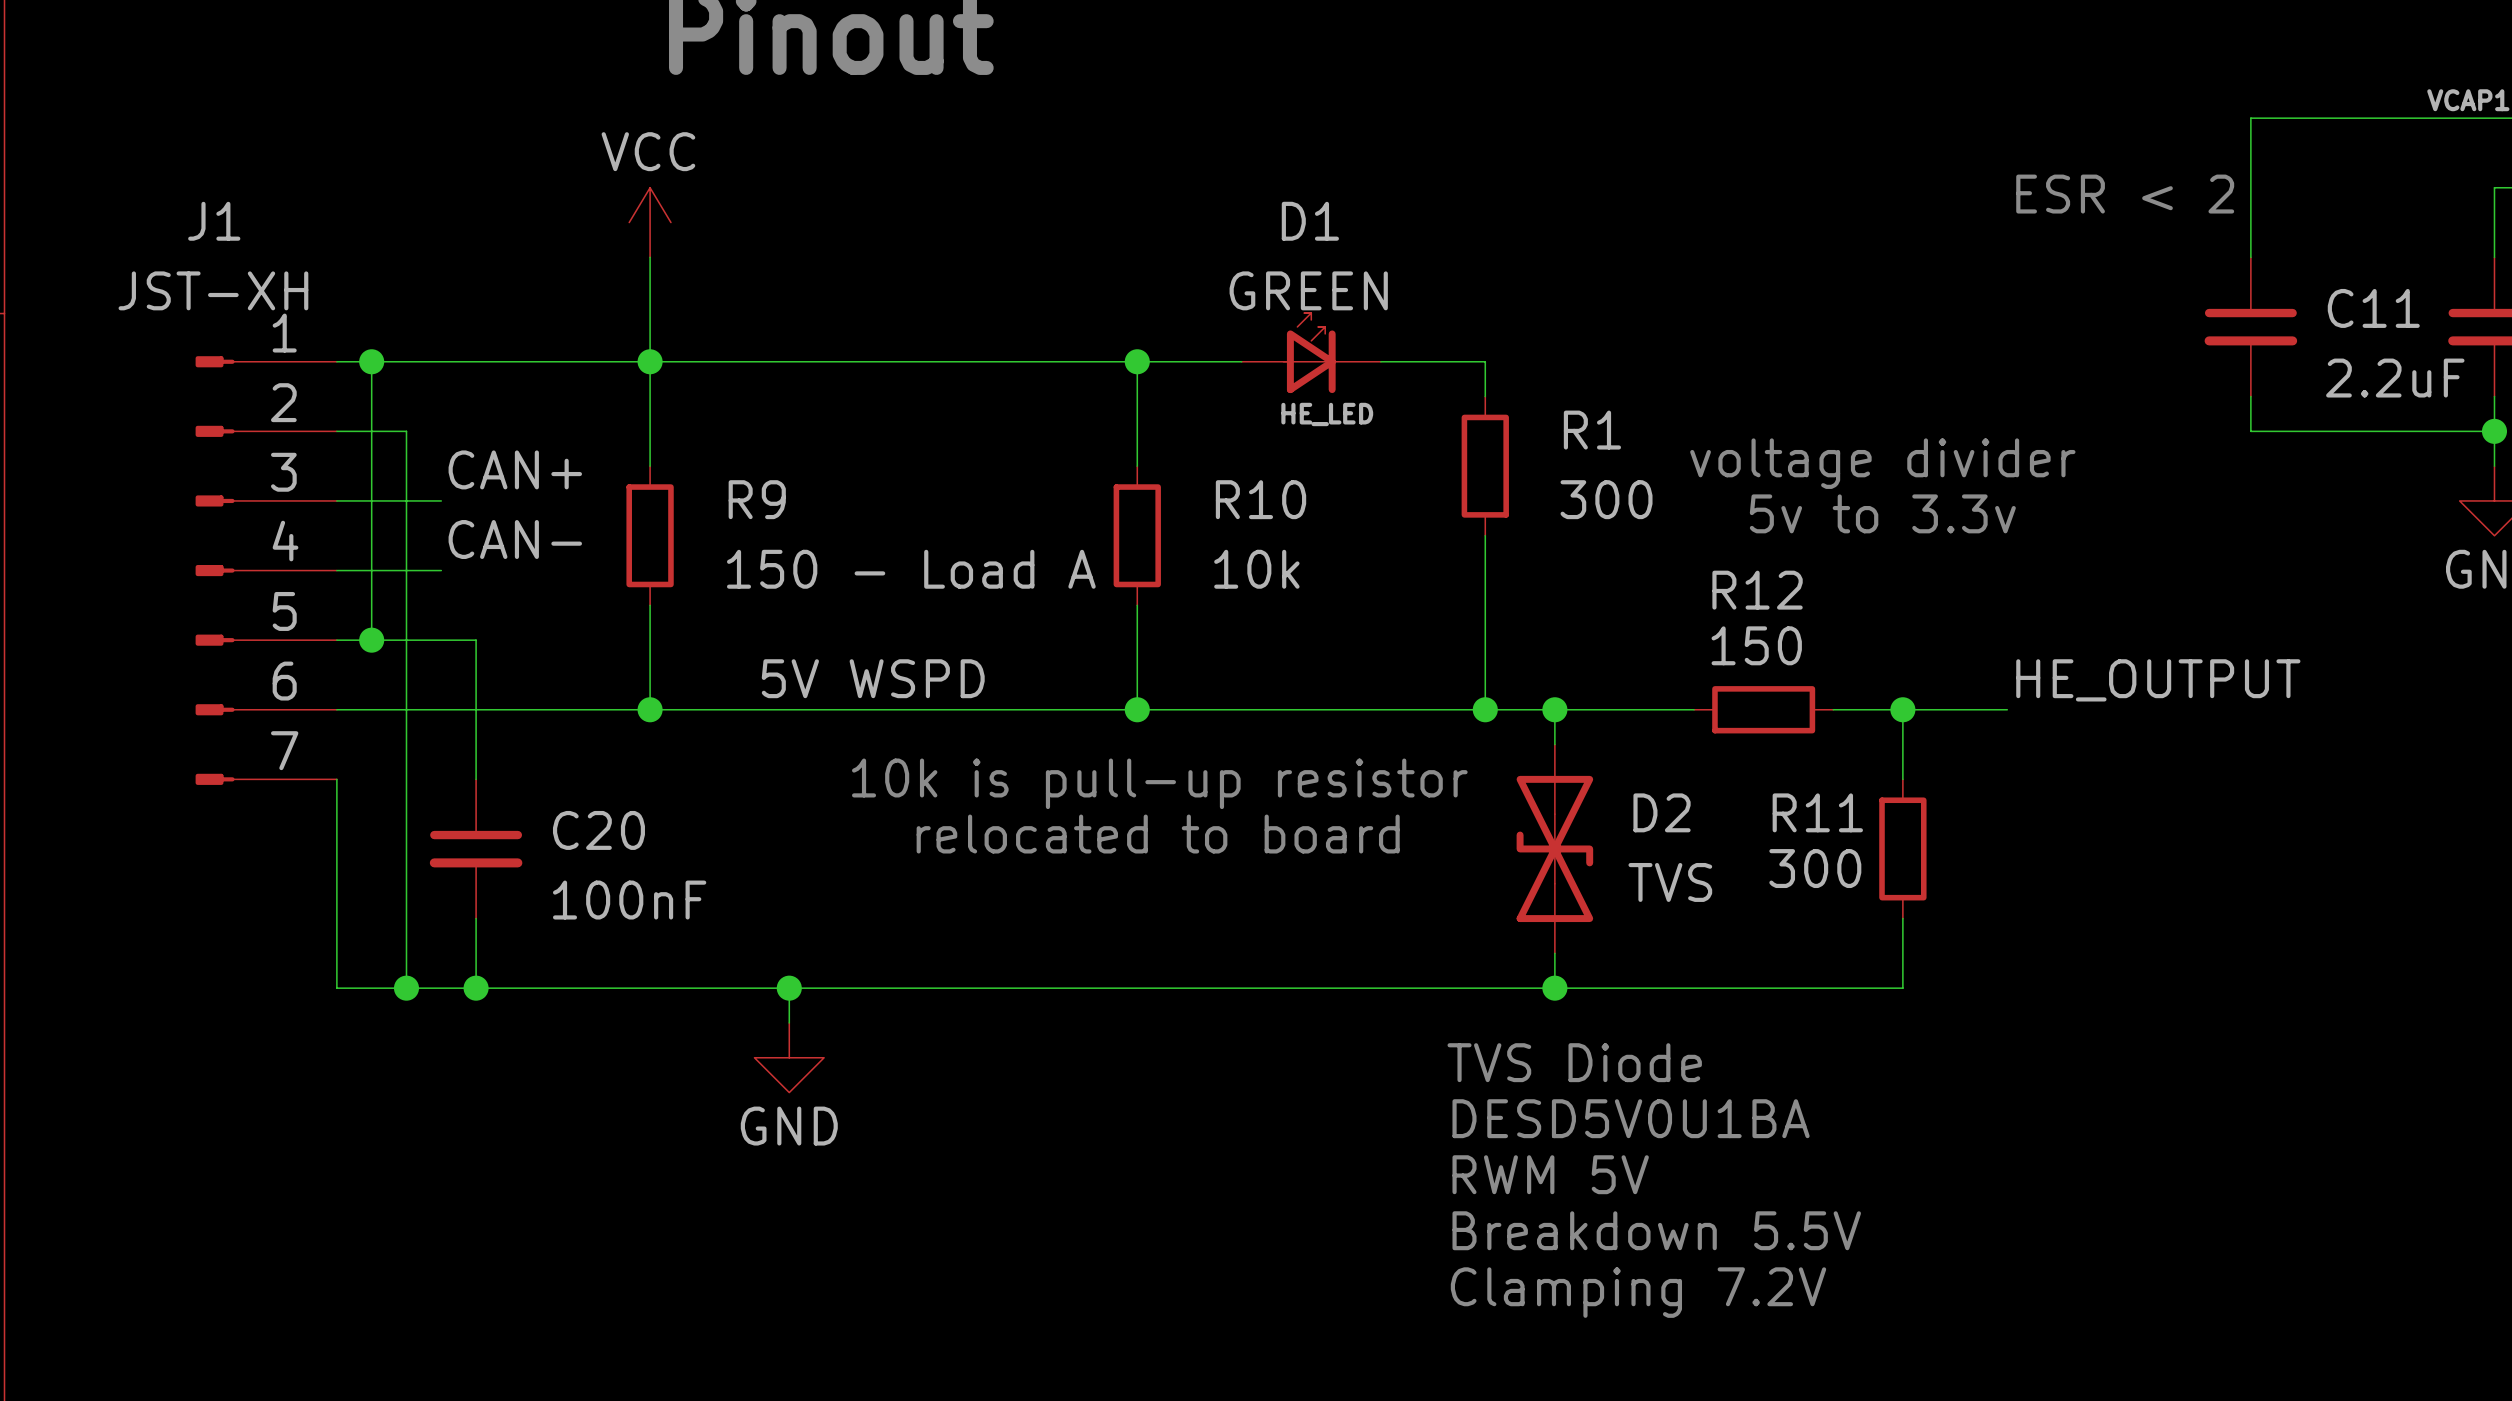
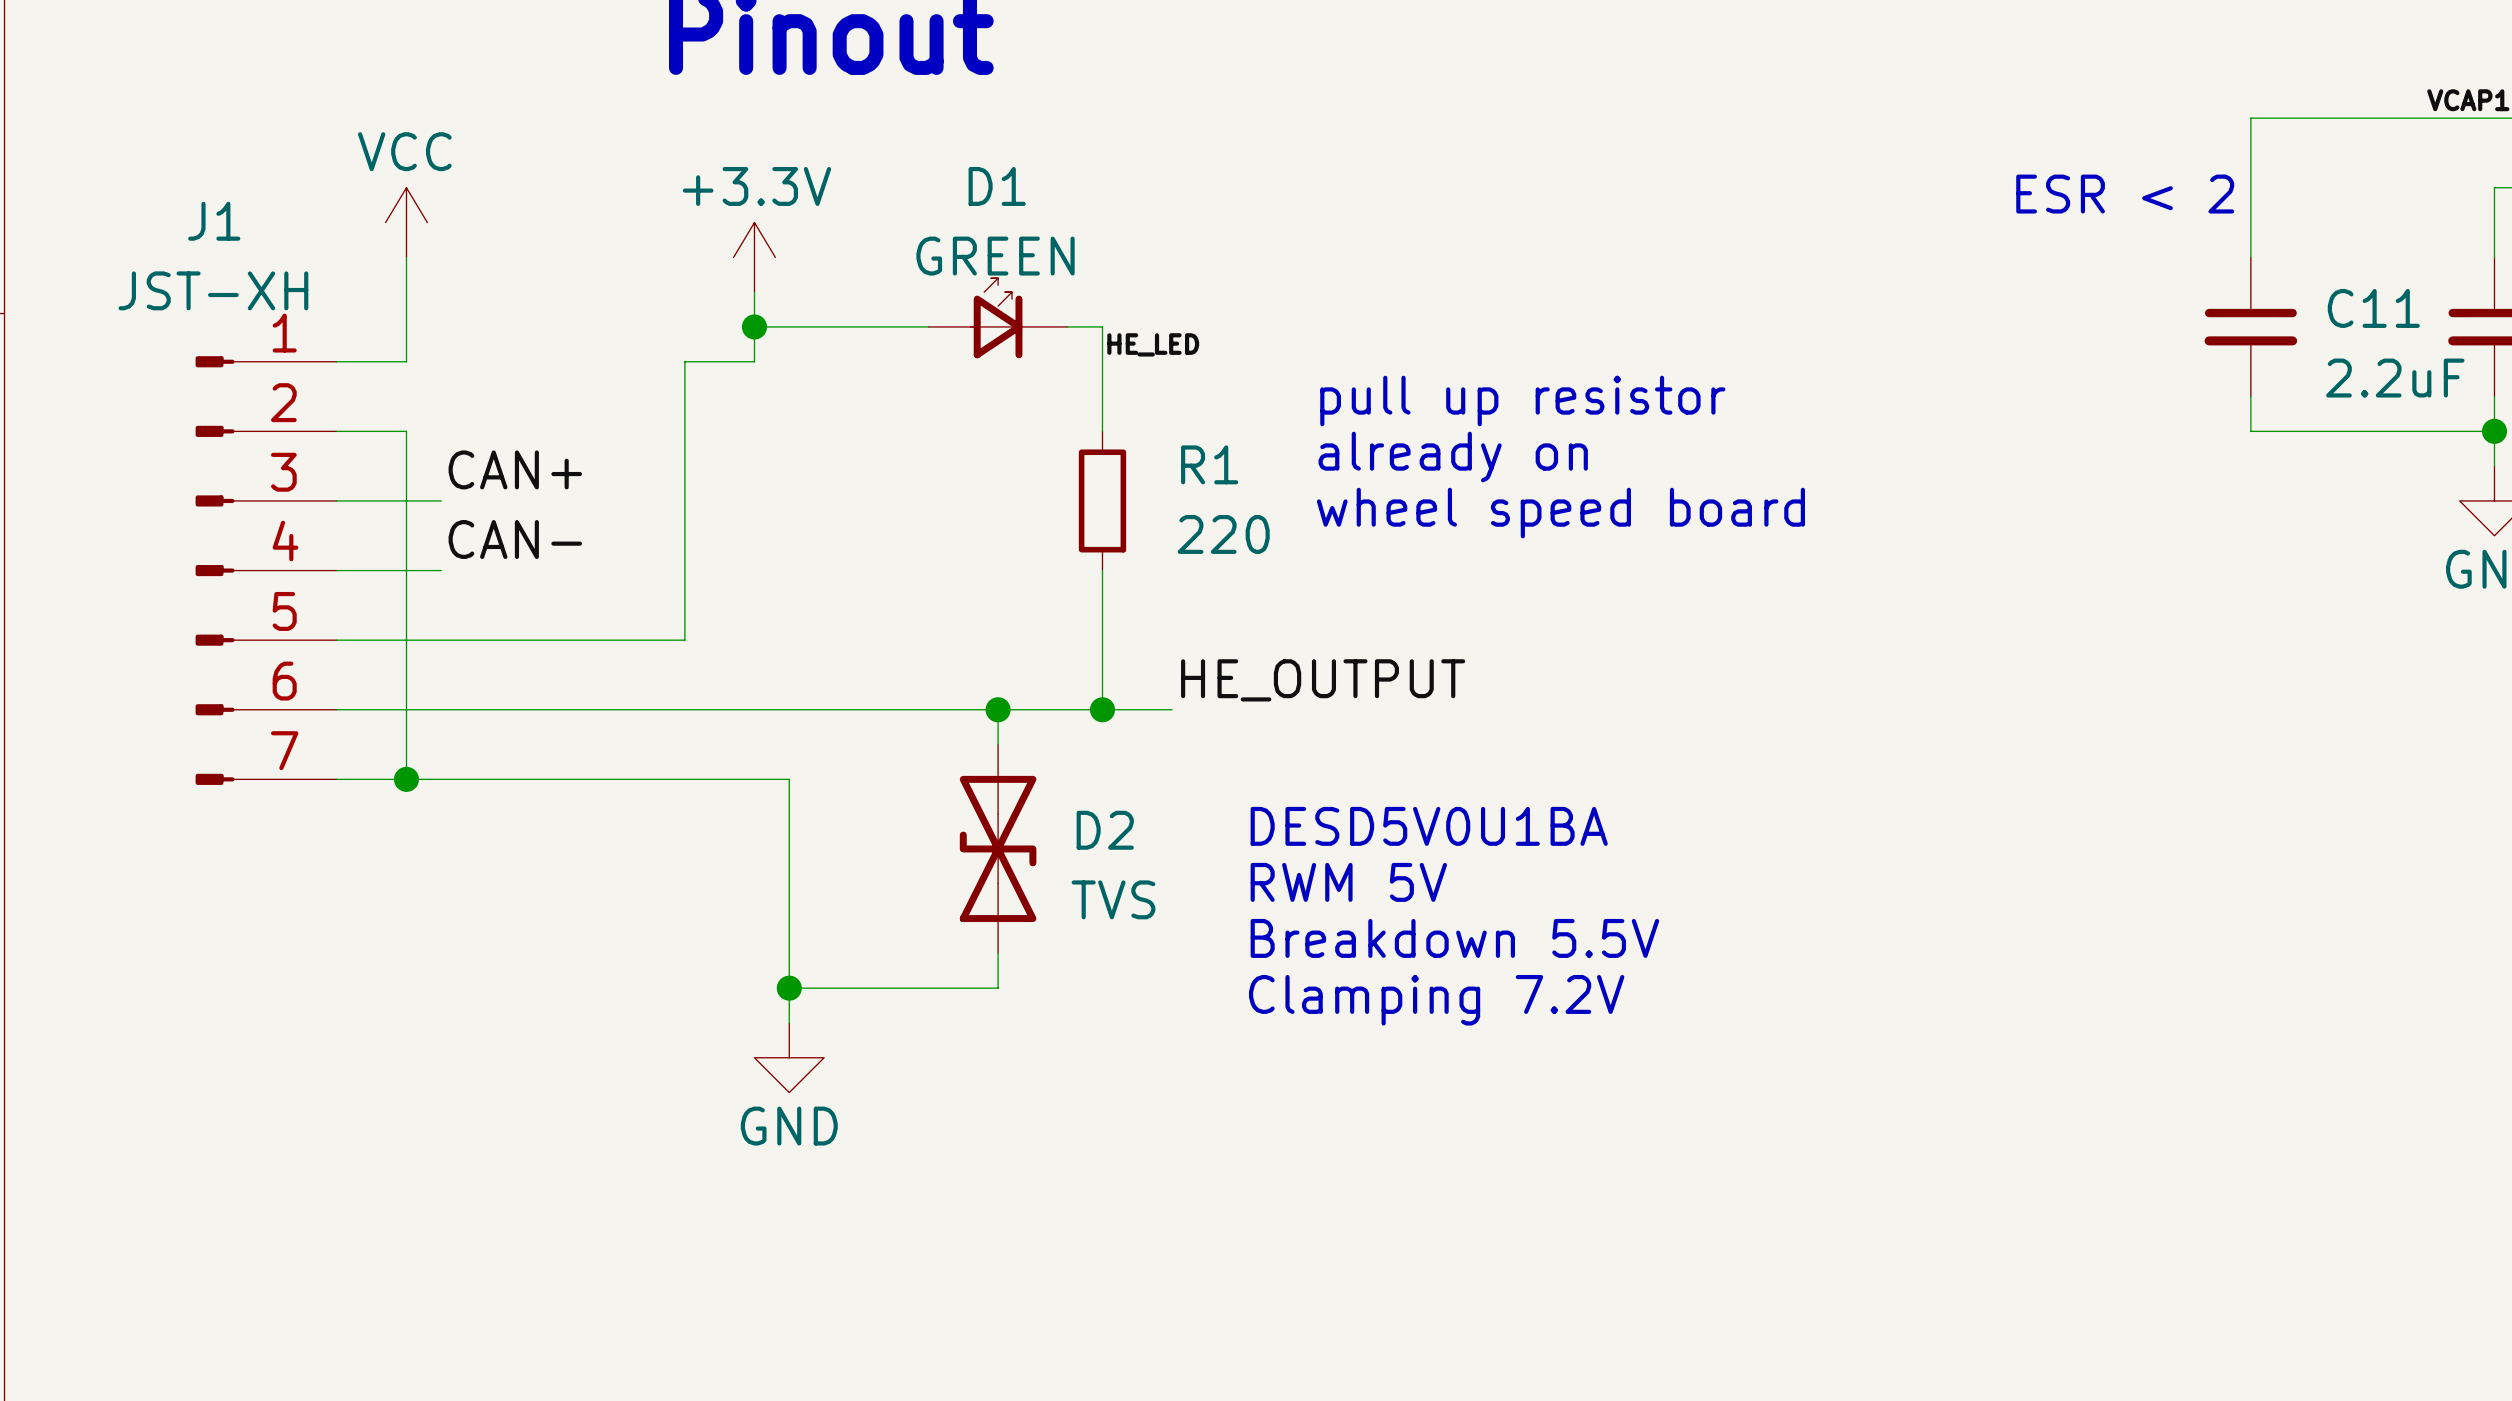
power symbol position: VCC (650, 222) -> VCC (406, 222)
wire: (650, 257) (650, 466) -> none
power symbol: none -> +3.3V (754, 257)
wire: none -> (754, 326) (928, 326)
wire: none -> (1067, 326) (1102, 326) (1102, 431)
D1 position: (1311, 353) -> (998, 318)
wire: (371, 361) (371, 640) -> none
junction: (371, 361) -> none
wire: (406, 361) (684, 361) -> (476, 640) (684, 640) (684, 361)
junction position: (650, 361) -> (754, 326)
wire: (754, 361) (1241, 361) -> (754, 361) (754, 292)
wire: (1137, 361) (1137, 466) -> none
junction: (1137, 361) -> none
wire: (1380, 361) (1485, 361) (1485, 396) -> none
text: none -> pull up resistor (1522, 401)
label position: HE_LED (1327, 414) -> HE_LED (1153, 344)
text: none -> already on (1453, 457)
text: voltage divider (1882, 463) -> none
R1 position: (1485, 466) -> (1102, 500)
R1 value: 300 (1606, 499) -> 220 (1223, 534)
text: none -> wheel speed board (1560, 513)
text: 5v to 3.3v (1882, 513) -> none
R9: 150 - Load A (650, 535) -> none
R10: 10k (1137, 535) -> none
wire: (1485, 535) (1485, 709) -> none
wire: (650, 605) (650, 709) -> (406, 257) (406, 361)
wire: (1137, 605) (1137, 709) -> none
junction: (371, 640) -> none
wire: (476, 640) (476, 779) -> (1102, 570) (1102, 709)
label: 5V WSPD (873, 678) -> none
label: none -> HE_OUTPUT (1323, 680)
label: HE_OUTPUT (2158, 680) -> none
junction: (650, 709) -> none
junction: none -> (998, 709)
junction position: (1137, 709) -> (1102, 709)
wire: (1172, 709) (1694, 709) -> none
junction: (1485, 709) -> none
wire: (1554, 709) (1554, 744) -> (998, 709) (998, 744)
junction: (1554, 709) -> none
R12: 150 (1763, 709) -> none
wire: (1833, 709) (2007, 709) -> none
wire: (1902, 709) (1902, 779) -> none
junction: (1902, 709) -> none
wire: (336, 779) (336, 988) (789, 988) -> (336, 779) (789, 779) (789, 988)
wire: (406, 779) (406, 988) -> none
junction: none -> (406, 779)
text: 10k is pull-up resistor (1159, 783) -> none
D2 name position: D2 (1662, 812) -> D2 (1105, 830)
text: relocated to board (1158, 834) -> none
C20: 100nF (476, 848) -> none
D2 position: (1554, 848) -> (998, 848)
R11: 300 (1902, 848) -> none
D2 value position: TVS (1670, 882) -> TVS (1113, 899)
wire: (476, 918) (476, 988) -> none
wire: (1902, 918) (1902, 988) (998, 988) -> (998, 953) (998, 988)
wire: (1554, 953) (1554, 988) -> none
junction: (406, 988) -> none
junction: (476, 988) -> none
junction: (1554, 988) -> none
text: TVS Diode (1574, 1062) -> none
text position: DESD5V0U1BA (1631, 1118) -> DESD5V0U1BA (1429, 826)
text position: RWM 5V (1550, 1174) -> RWM 5V (1348, 882)
text position: Breakdown 5.5V (1656, 1230) -> Breakdown 5.5V (1454, 938)
text position: Clamping 7.2V (1638, 1292) -> Clamping 7.2V (1436, 1000)

